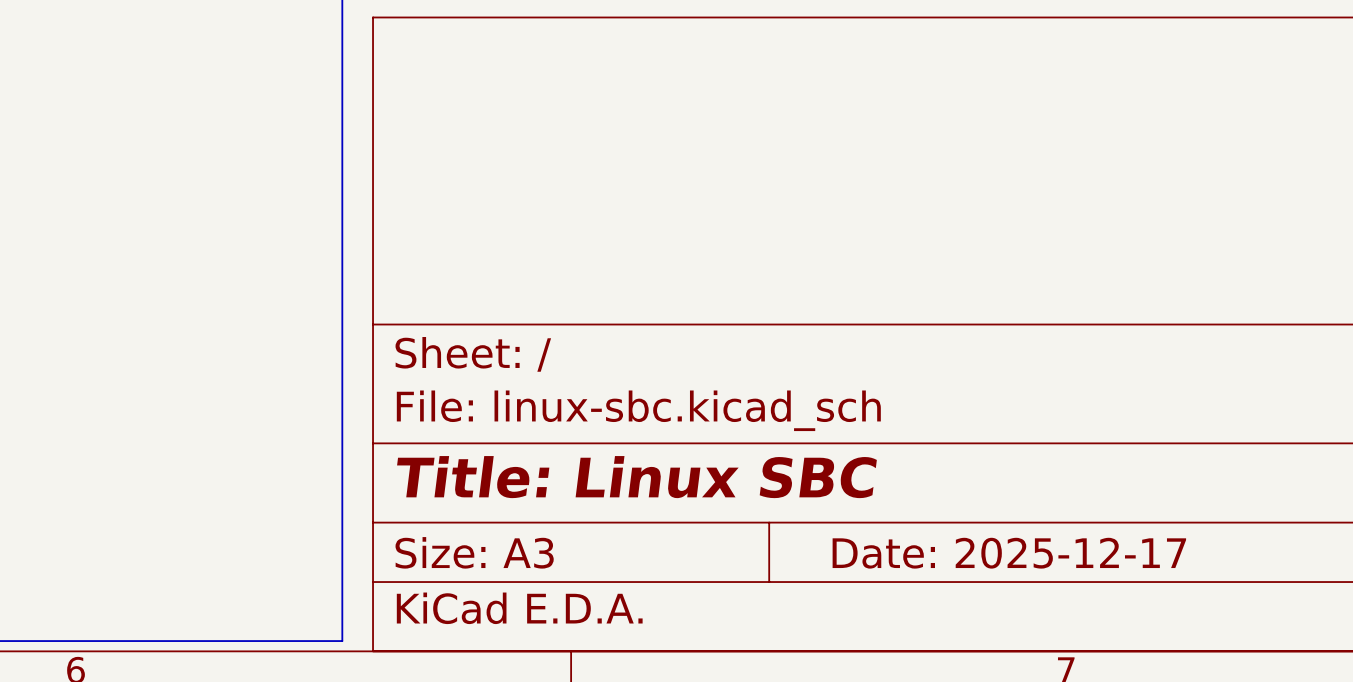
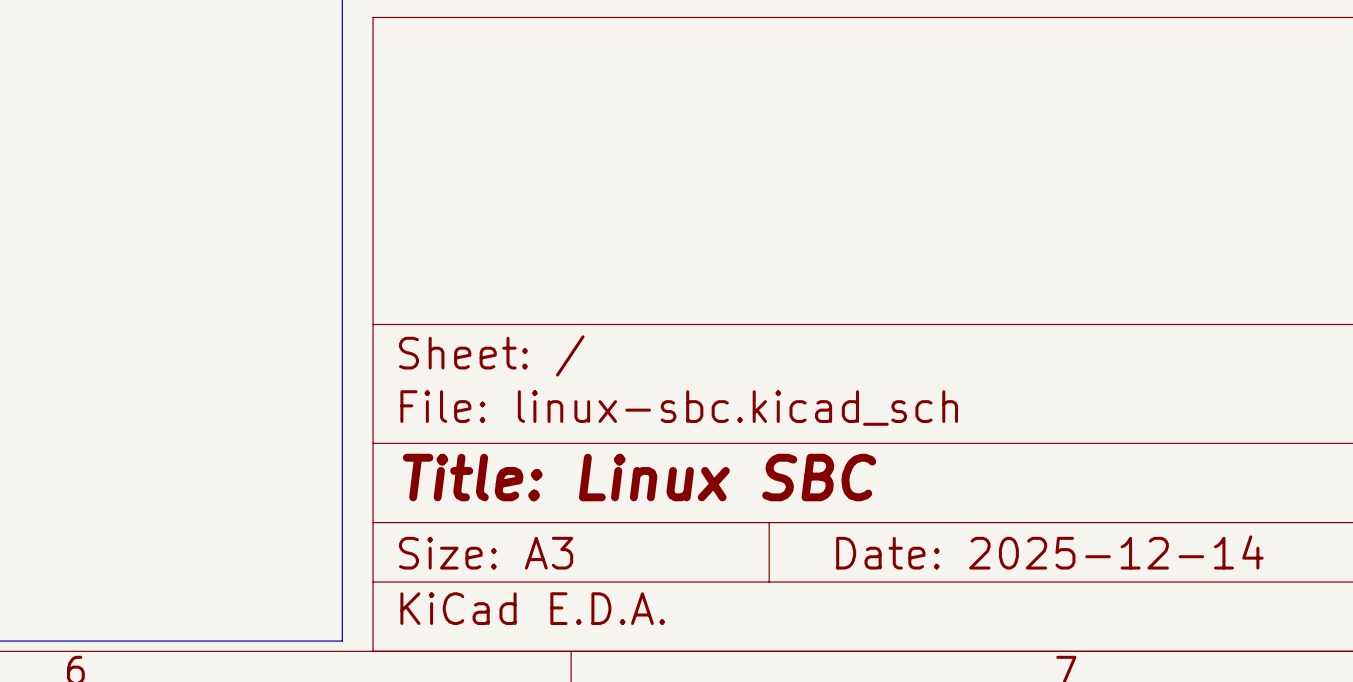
title block: Date: 2025-12-17 (1009, 553) -> Date: 2025-12-14 (1049, 552)

